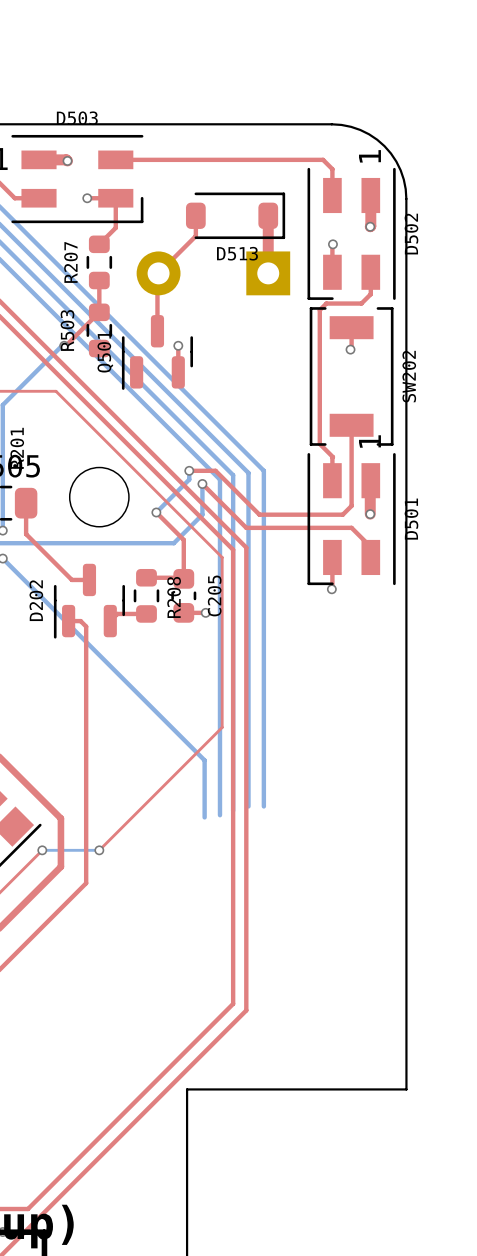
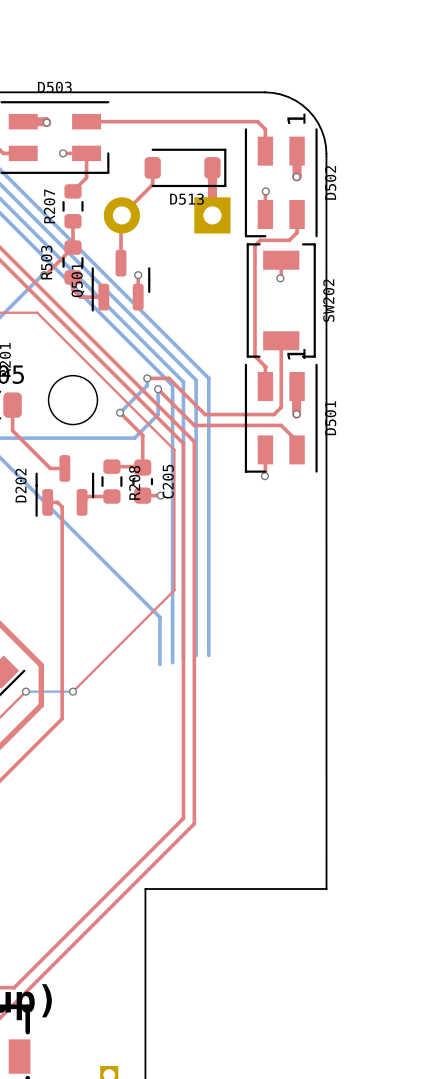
top track: none -> (73, 277) (73, 289) (80, 297) (103, 297)

